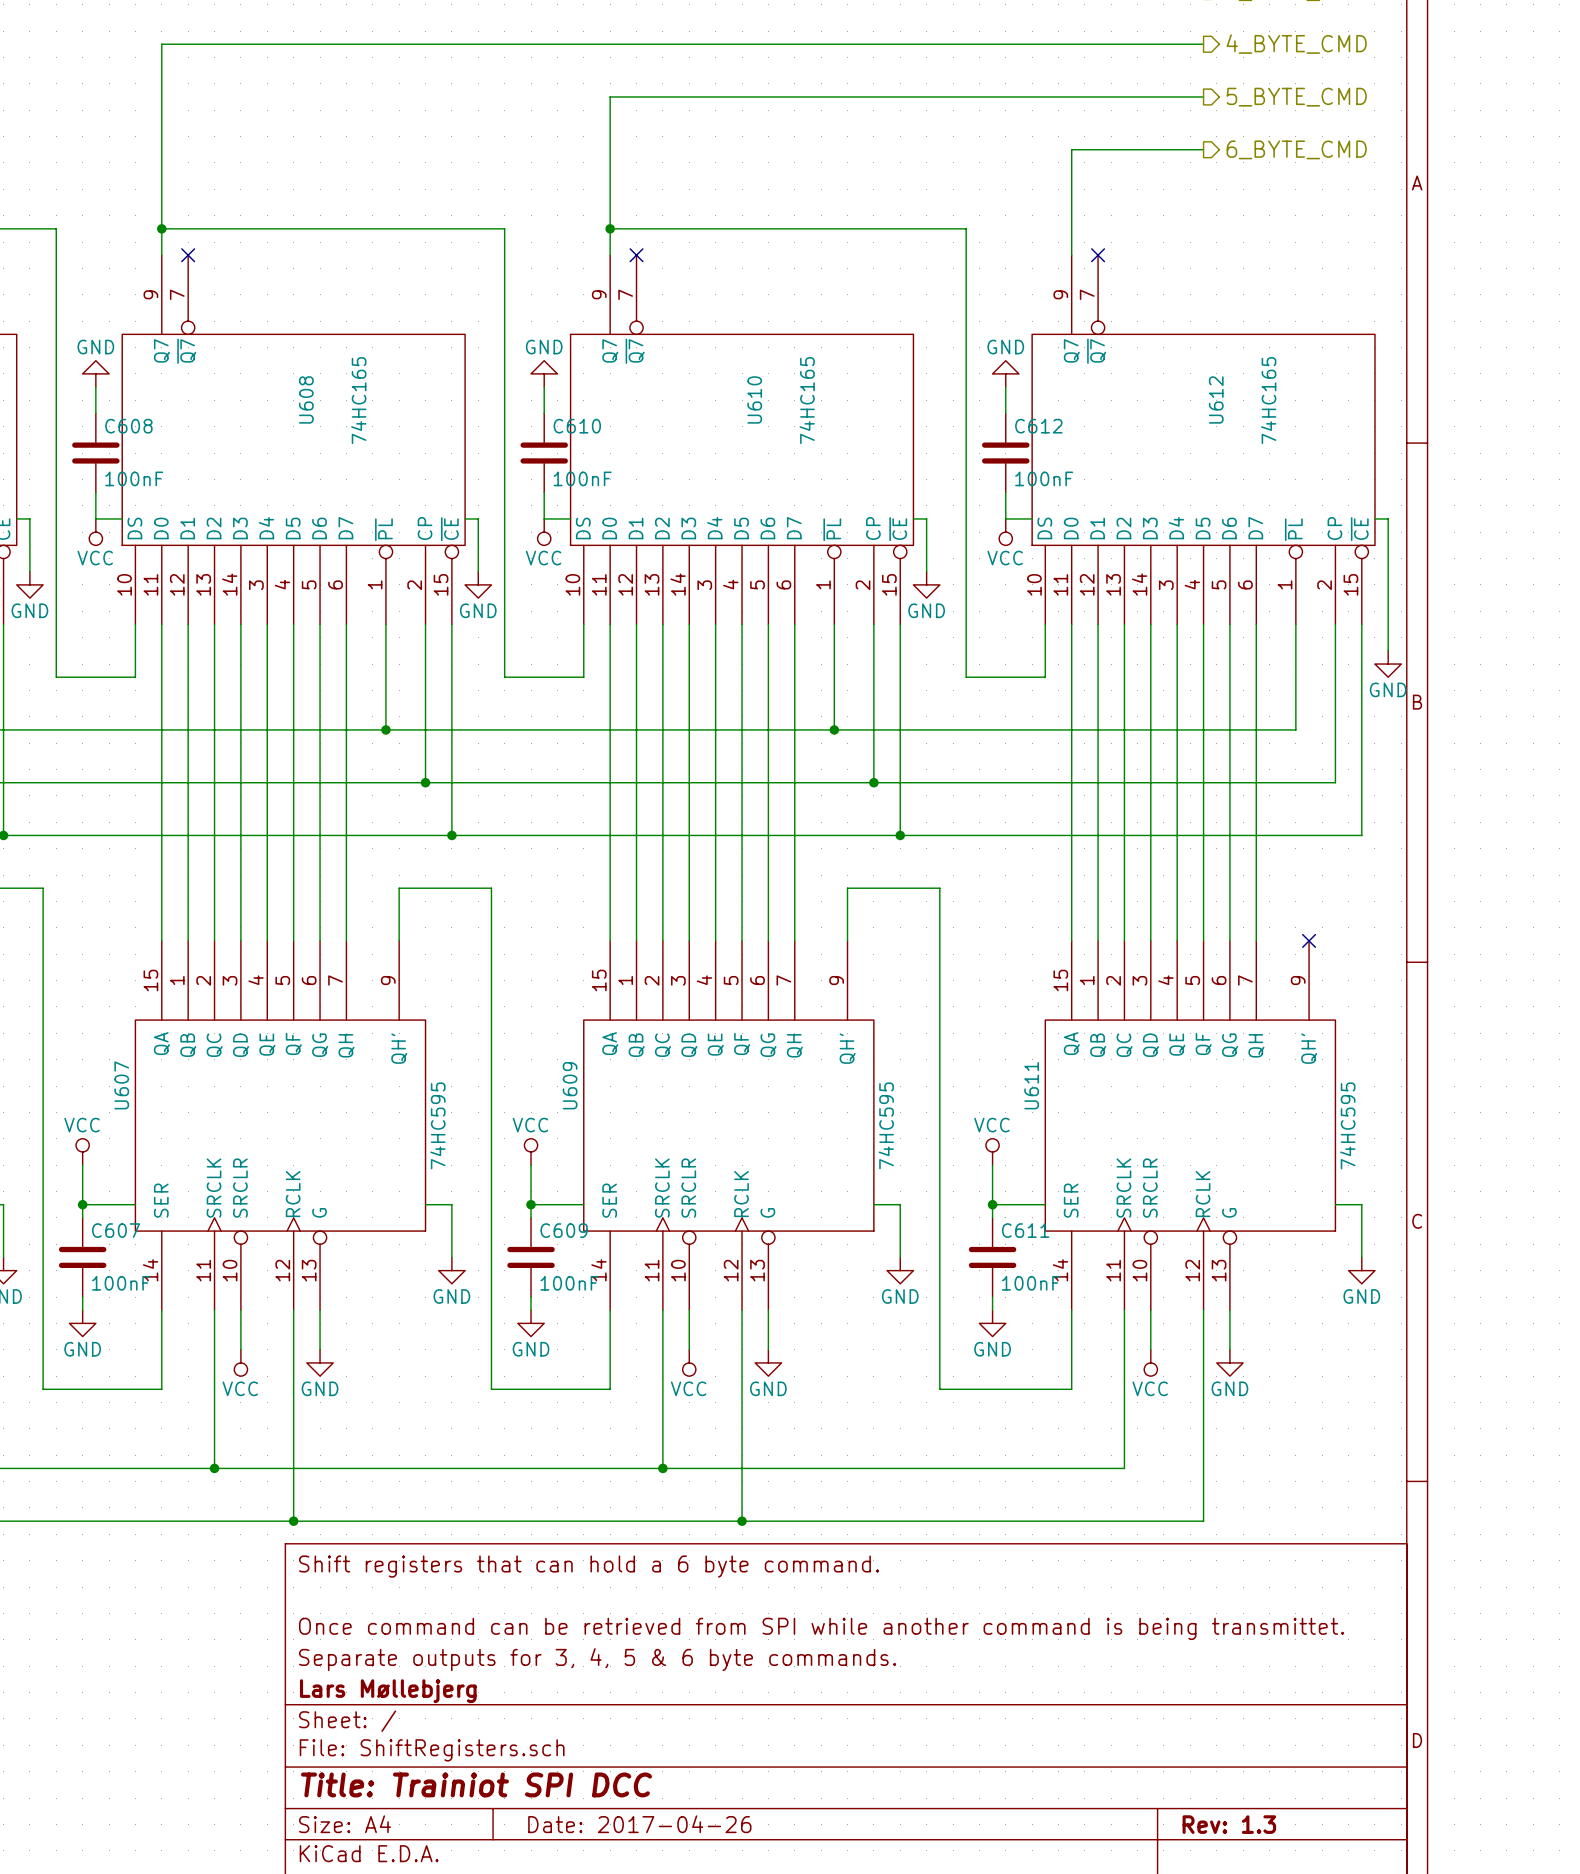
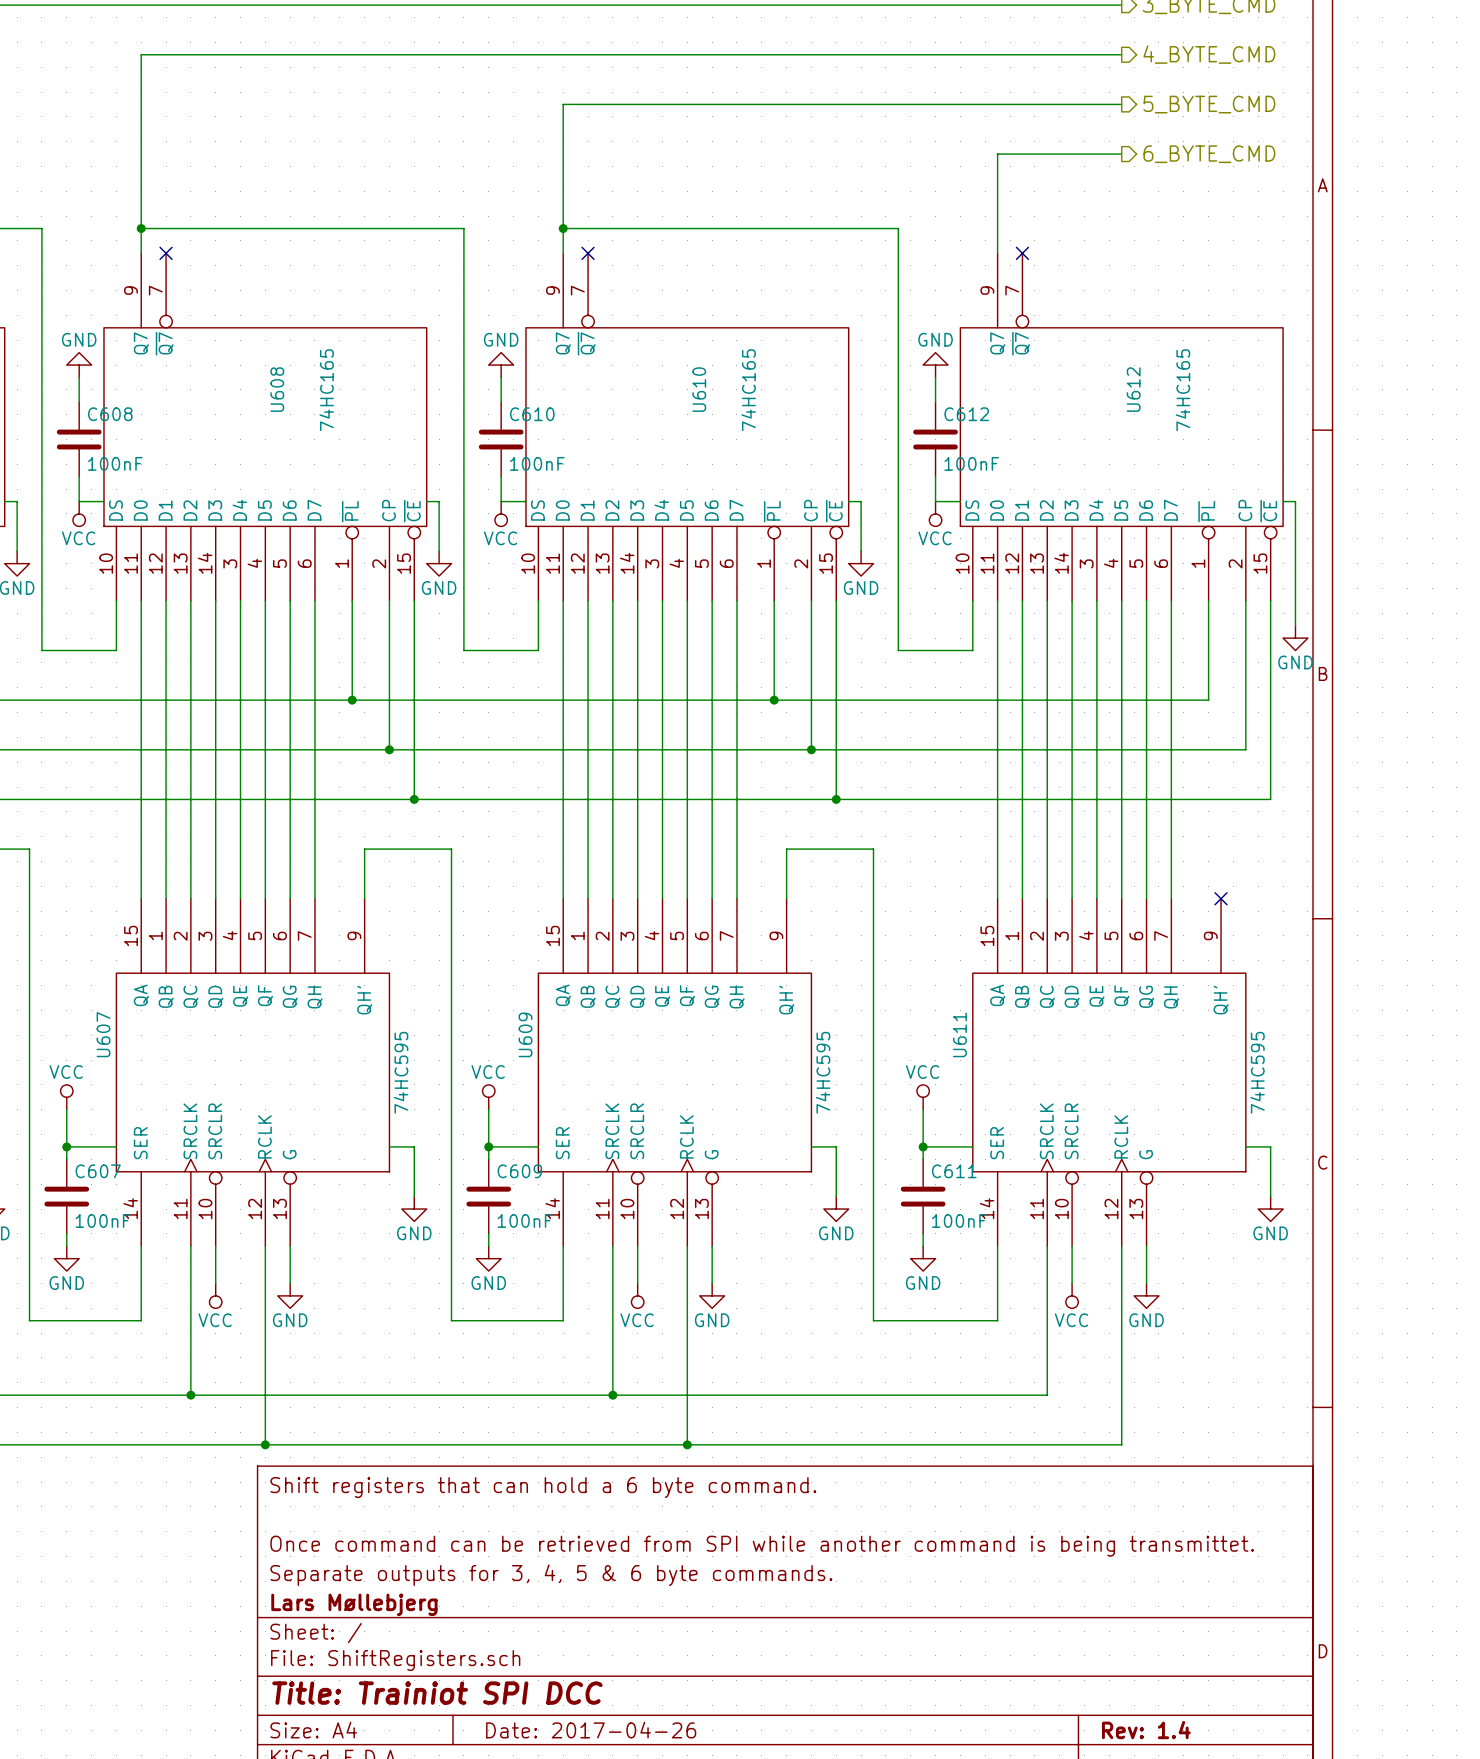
title block: Rev: 1.3 (1229, 1824) -> Rev: 1.4 (1146, 1730)

